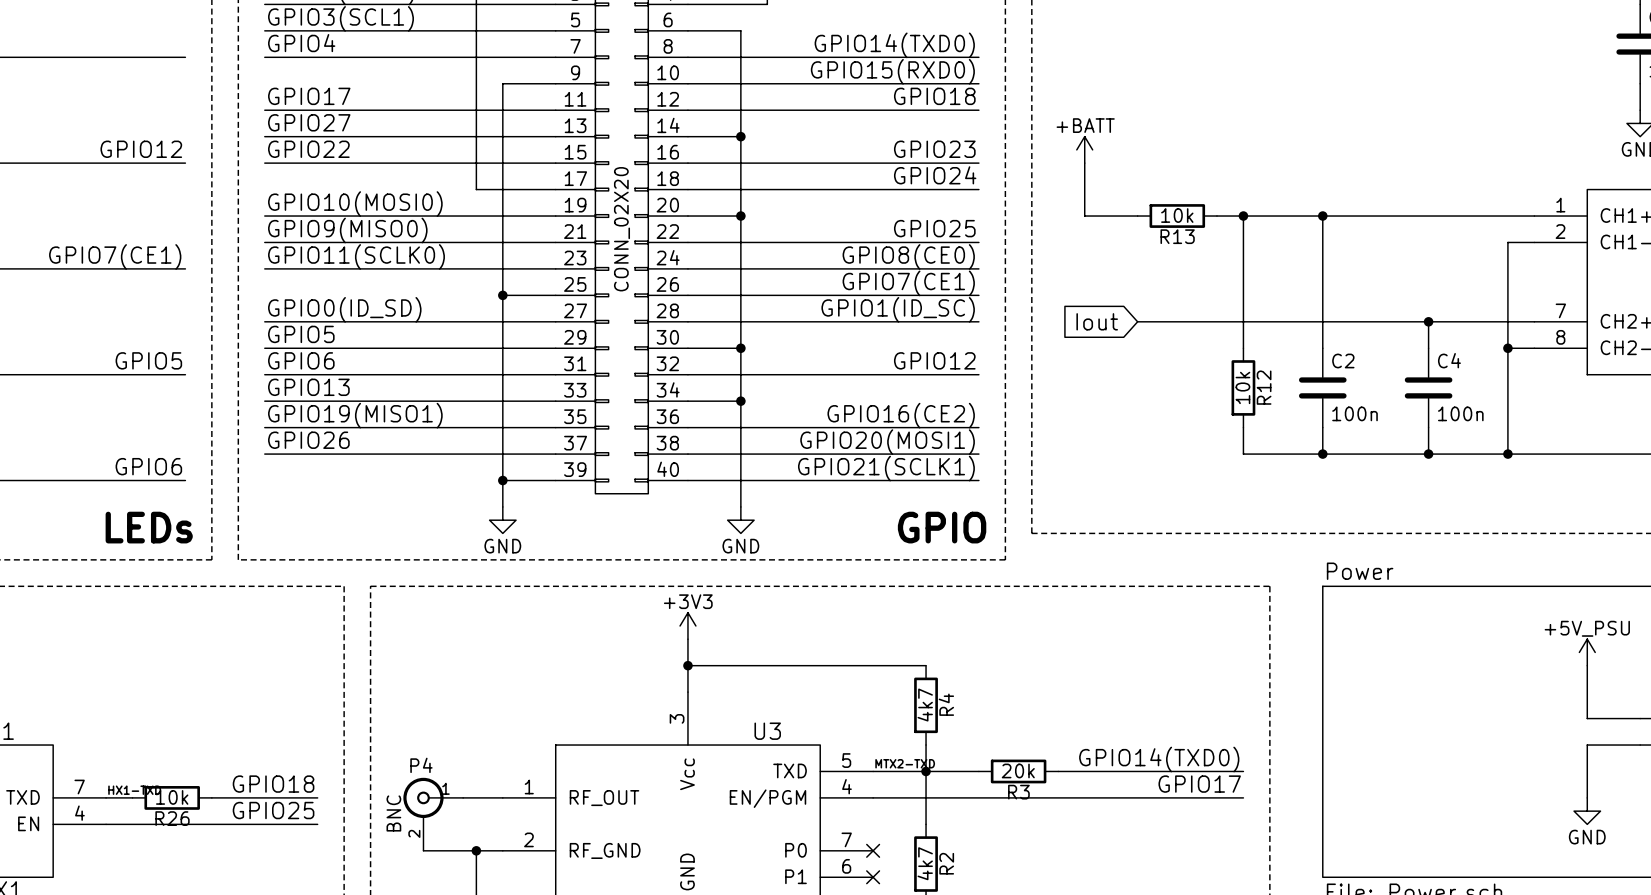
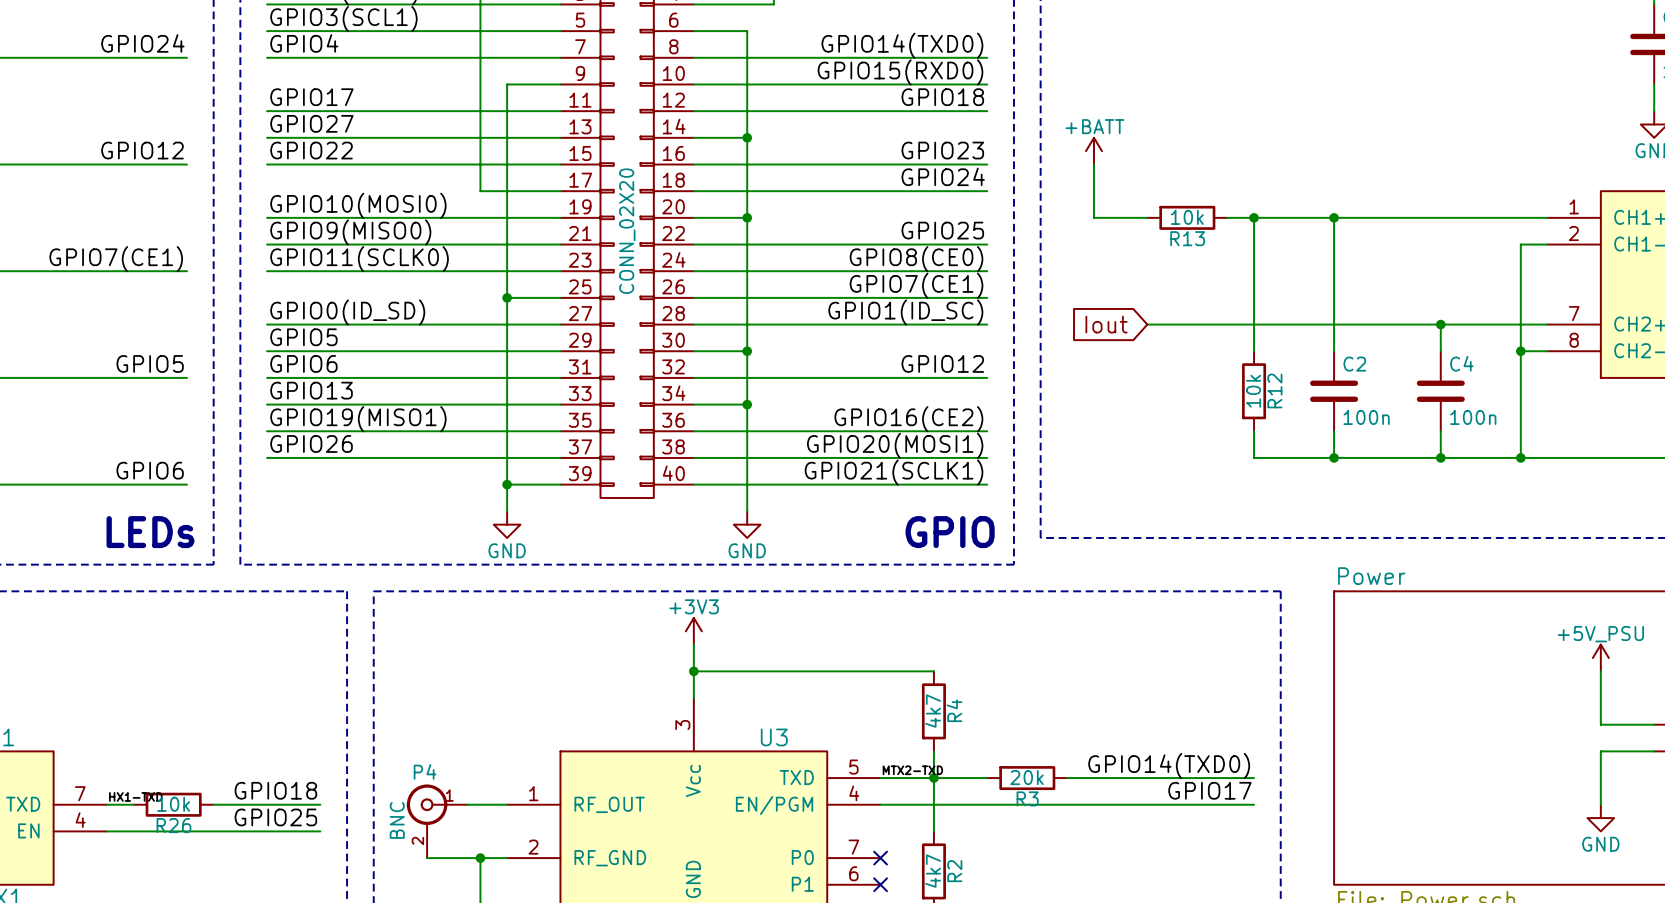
label: none -> GPIO24 (142, 43)

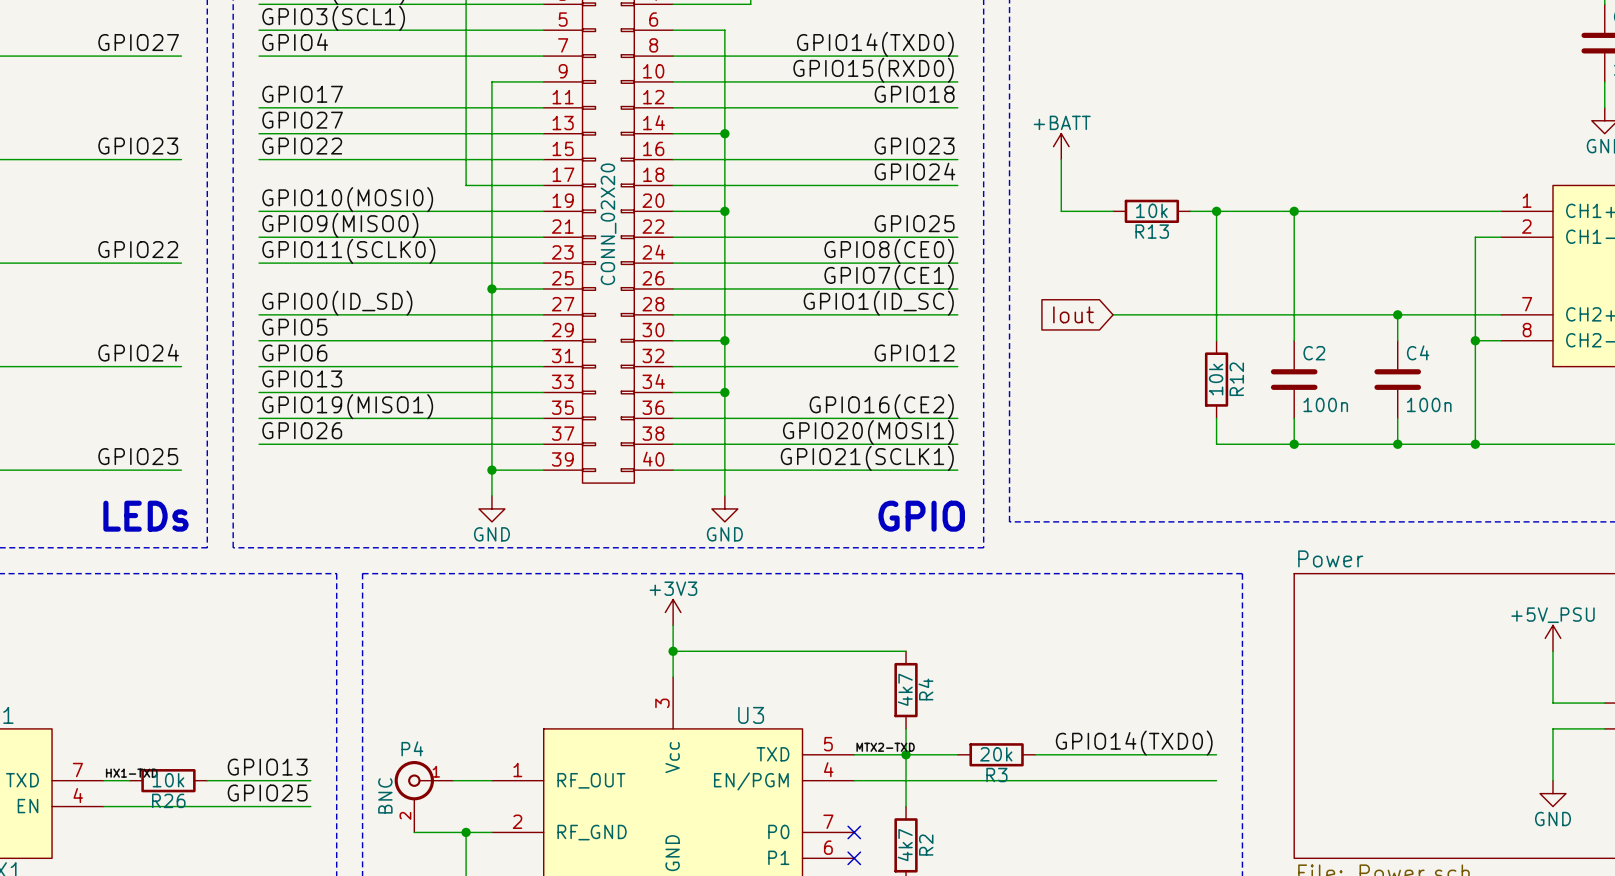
label: GPIO24 (142, 43) -> GPIO27 (138, 42)
label: GPIO12 (142, 150) -> GPIO23 (138, 146)
label: GPIO7(CE1) (116, 259) -> GPIO22 (138, 249)
label: GPIO5 (150, 363) -> GPIO24 (138, 352)
label: GPIO6 (150, 470) -> GPIO25 (138, 456)
label: GPIO18 (275, 790) -> GPIO13 (267, 767)
label: GPIO17 (1209, 790) -> none

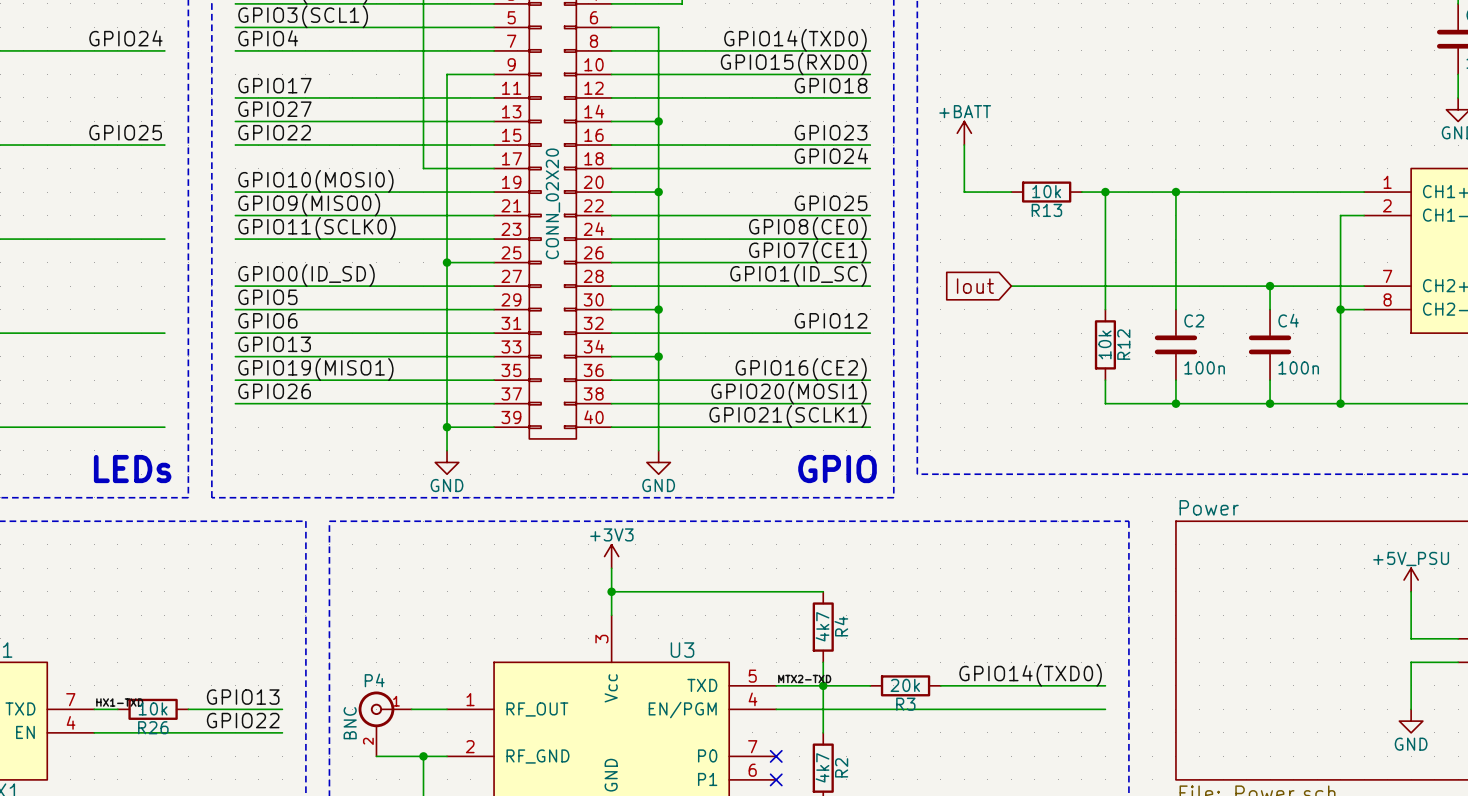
label: GPIO27 (138, 42) -> GPIO24 (125, 38)
label: GPIO23 (138, 146) -> GPIO25 (125, 132)
label: GPIO22 (138, 249) -> none
label: GPIO24 (138, 352) -> none
label: GPIO25 (138, 456) -> none
label: GPIO25 (267, 793) -> GPIO22 (243, 720)

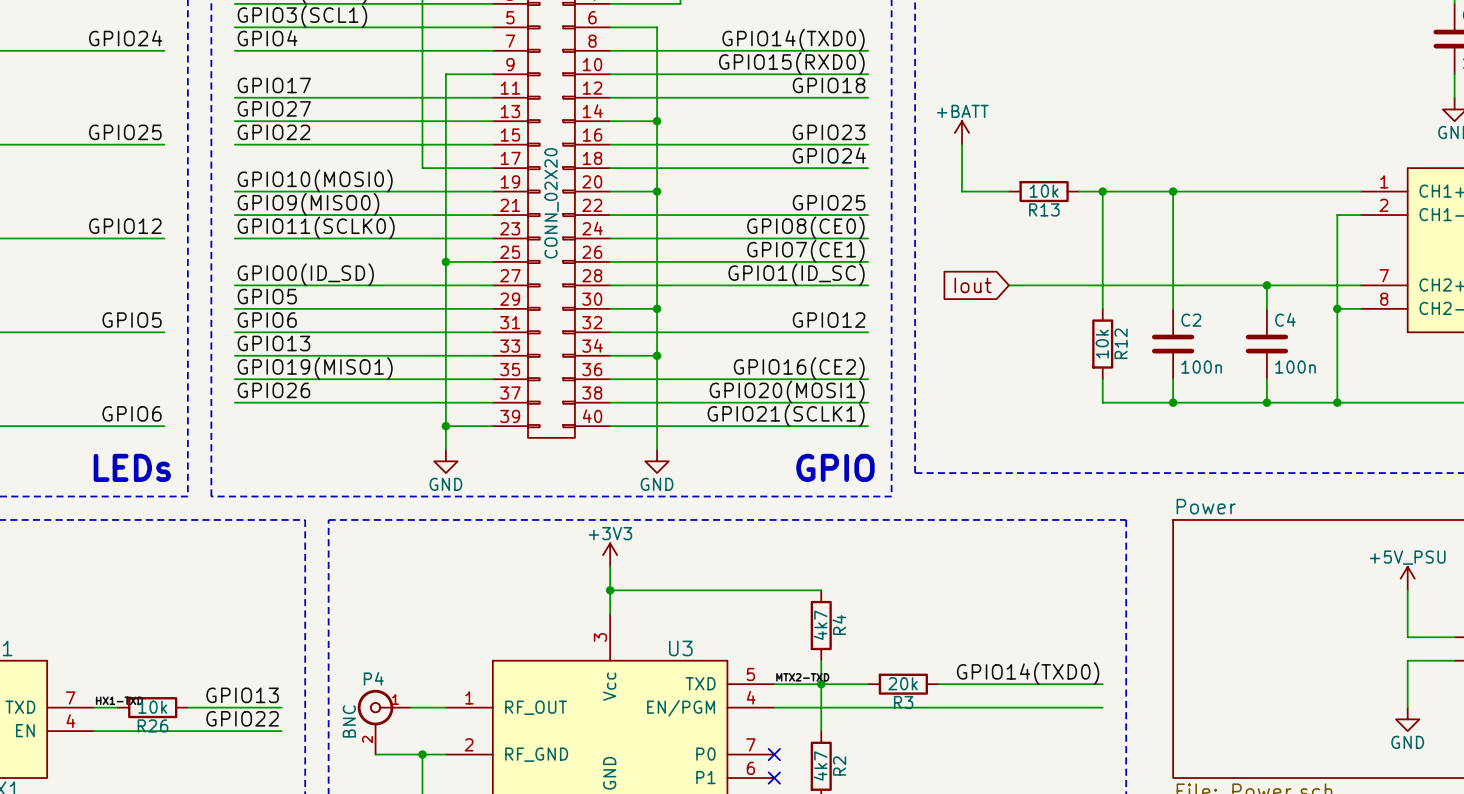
label: none -> GPIO12 (125, 226)
label: none -> GPIO5 (132, 320)
label: none -> GPIO6 (132, 413)

